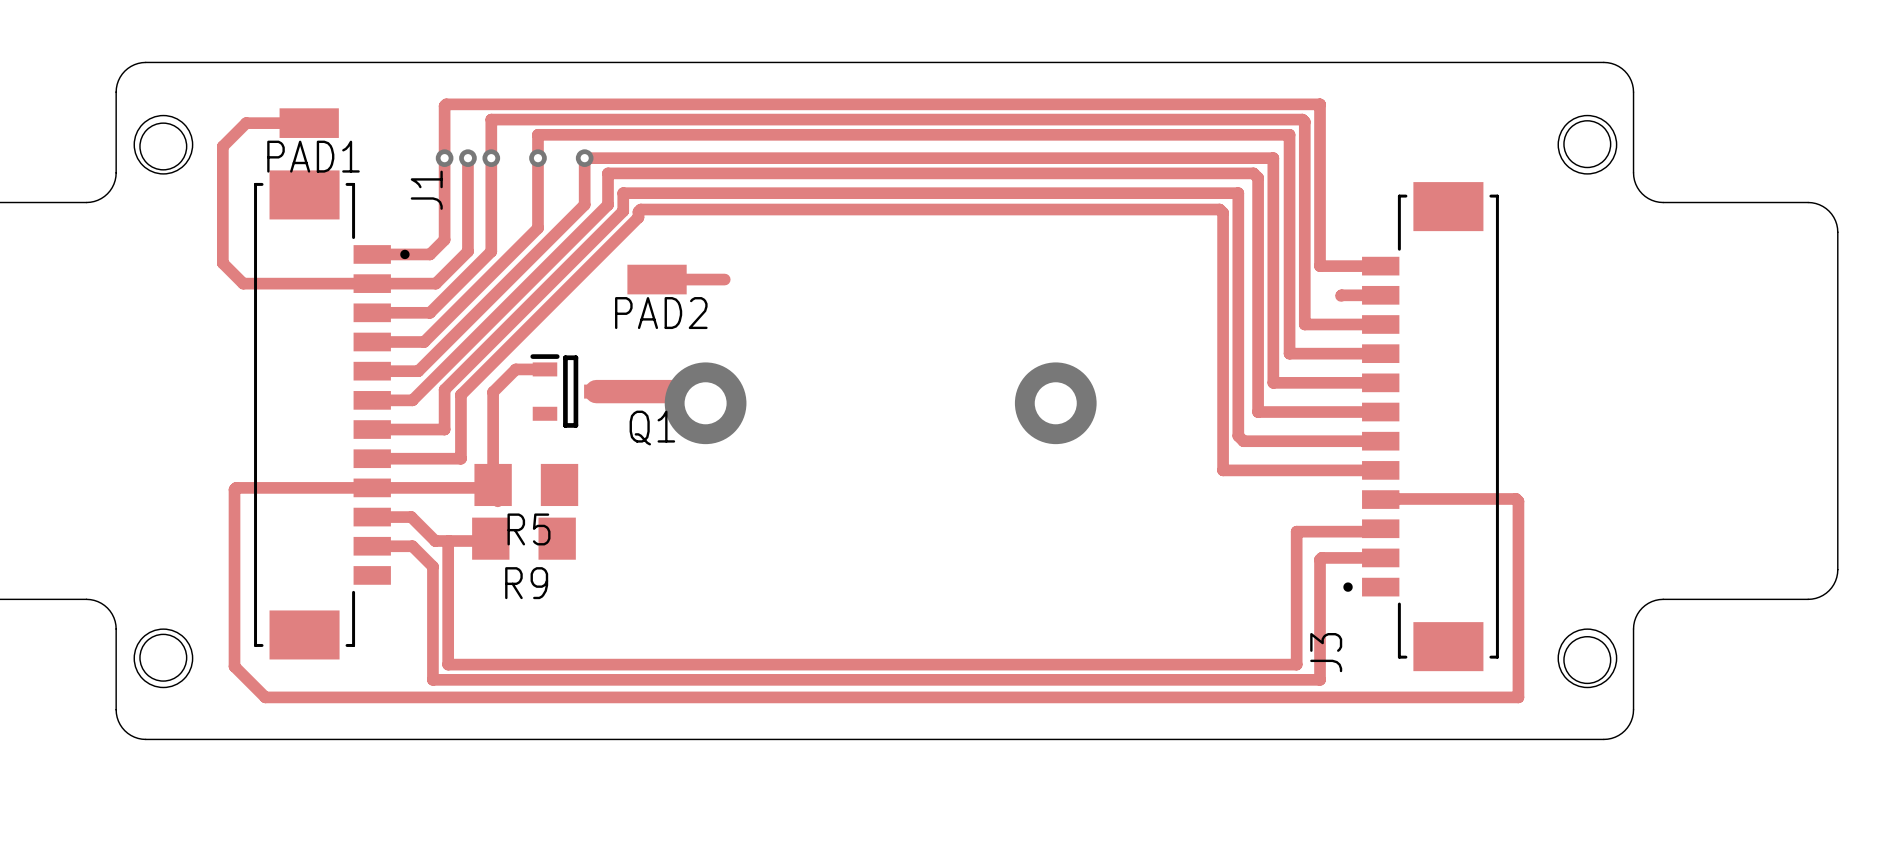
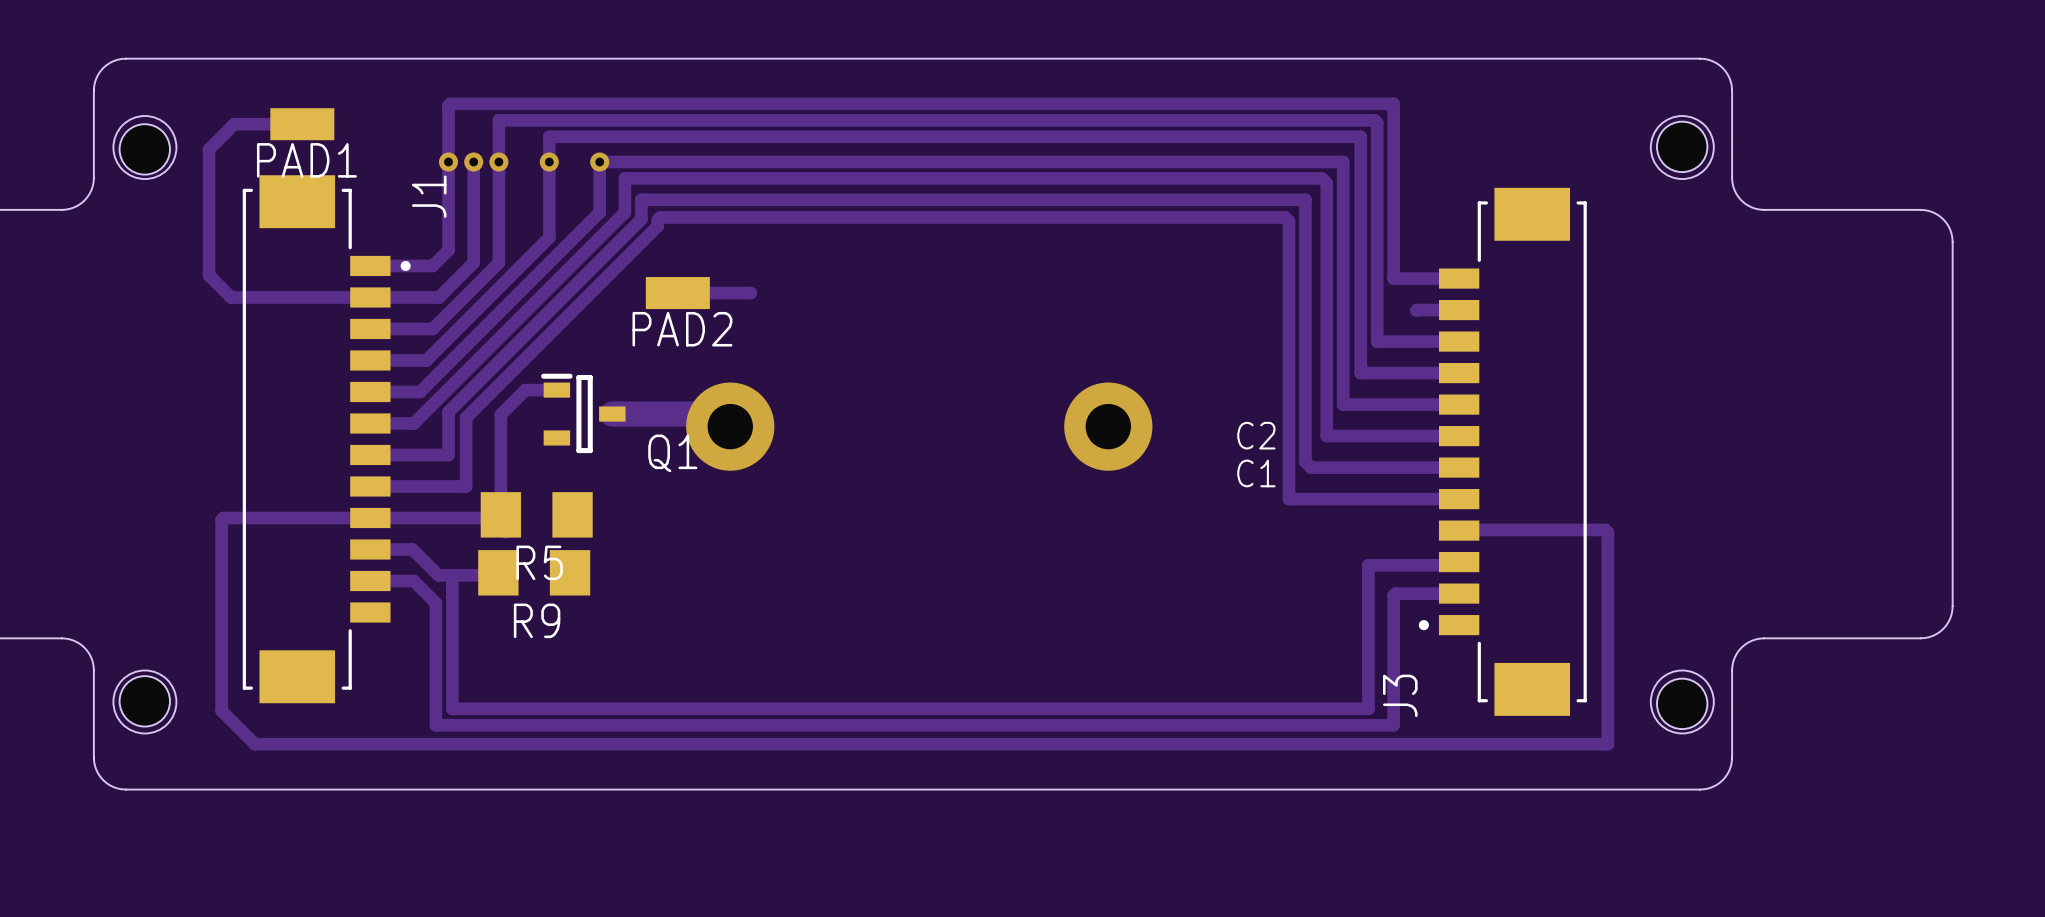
C2: none -> (1256, 435)
C1: none -> (1256, 473)

